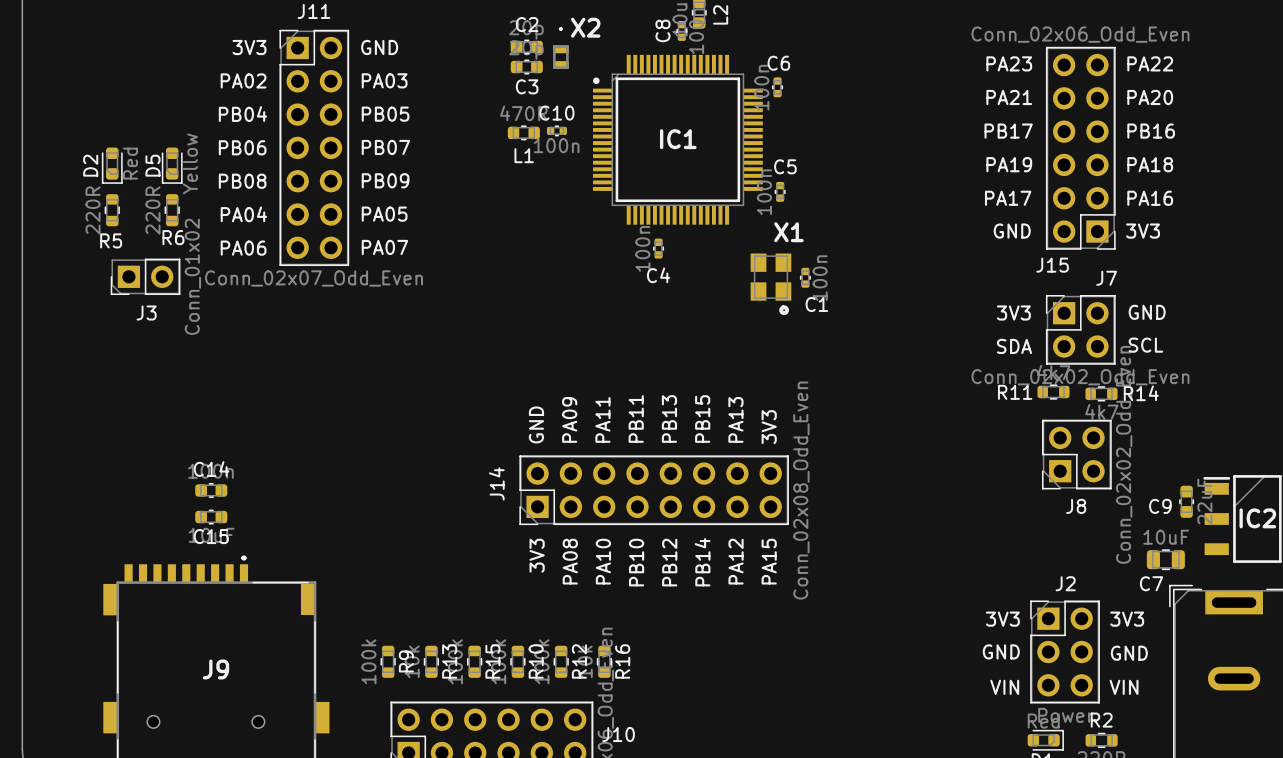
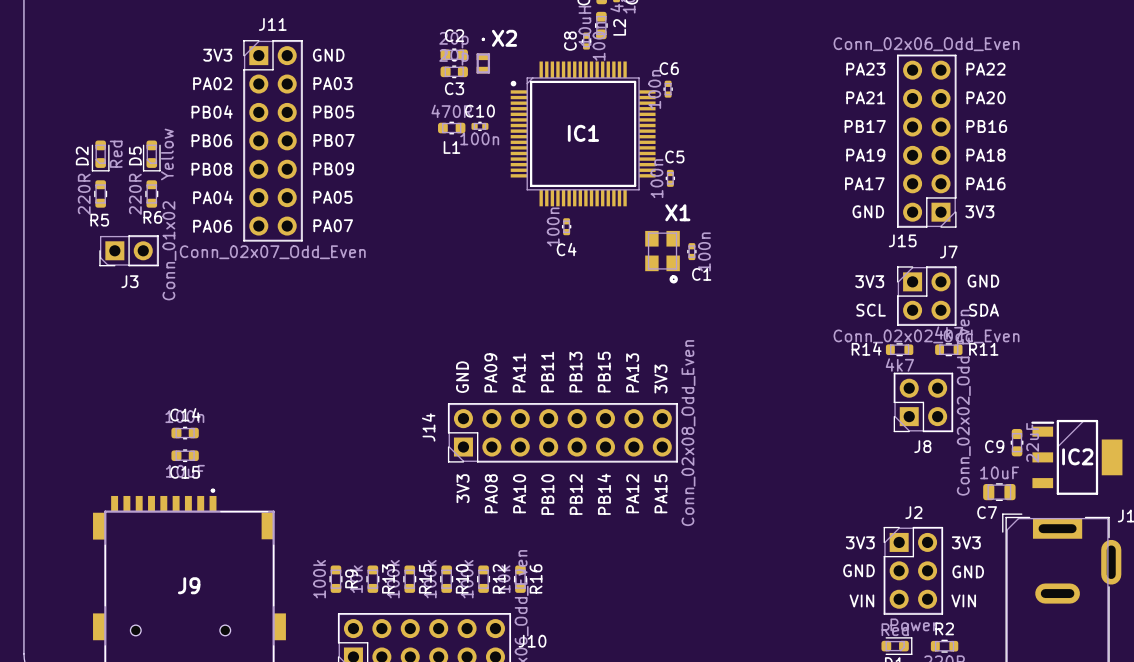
text: SCL (1145, 345) -> SDA (984, 310)
text: SDA (1014, 346) -> SCL (871, 310)
R11 name position: R11 (1015, 392) -> R11 (983, 349)
R11 position: (1053, 392) -> (948, 349)
R14 position: (1101, 393) -> (899, 349)
R14 name position: R14 (1141, 393) -> R14 (866, 349)

